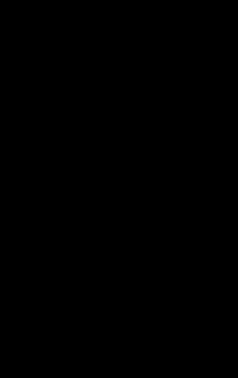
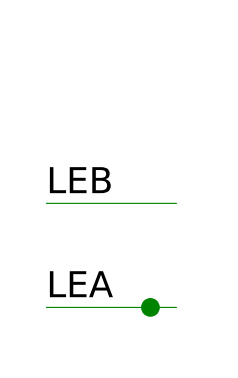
label: none -> LEB (80, 180)
wire: none -> (46, 203) (176, 203)
label: none -> LEA (81, 284)
wire: none -> (46, 307) (176, 307)
junction: none -> (150, 307)

